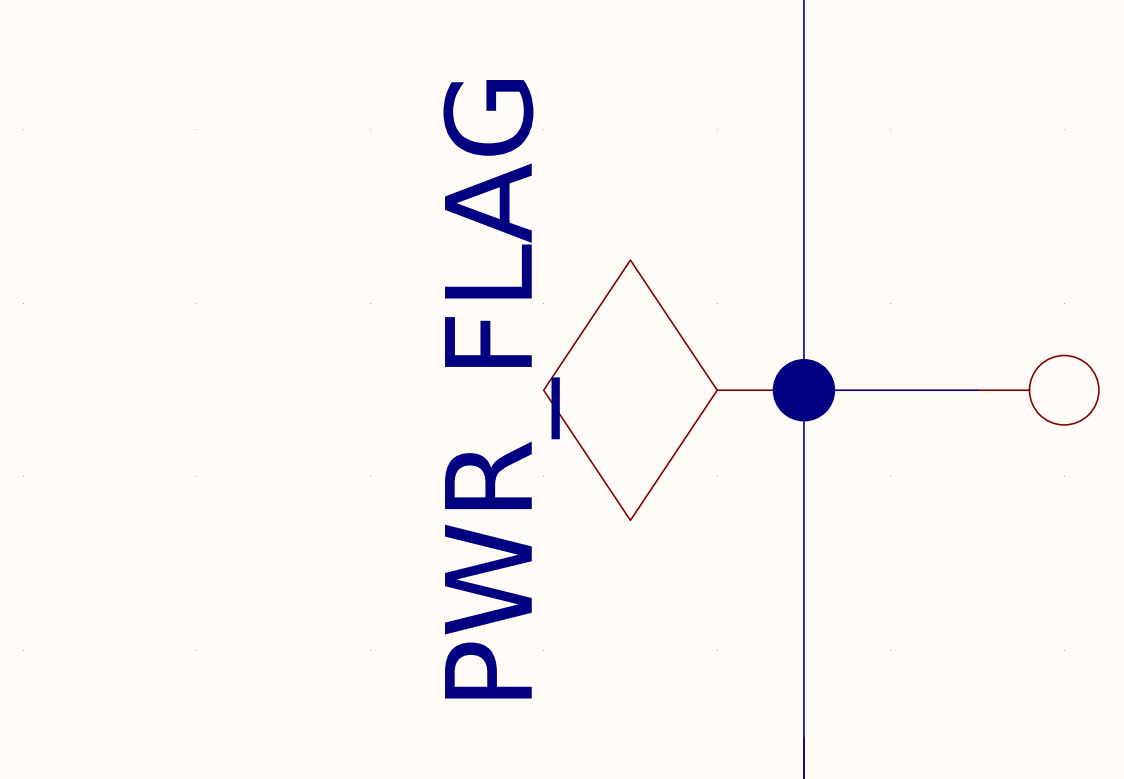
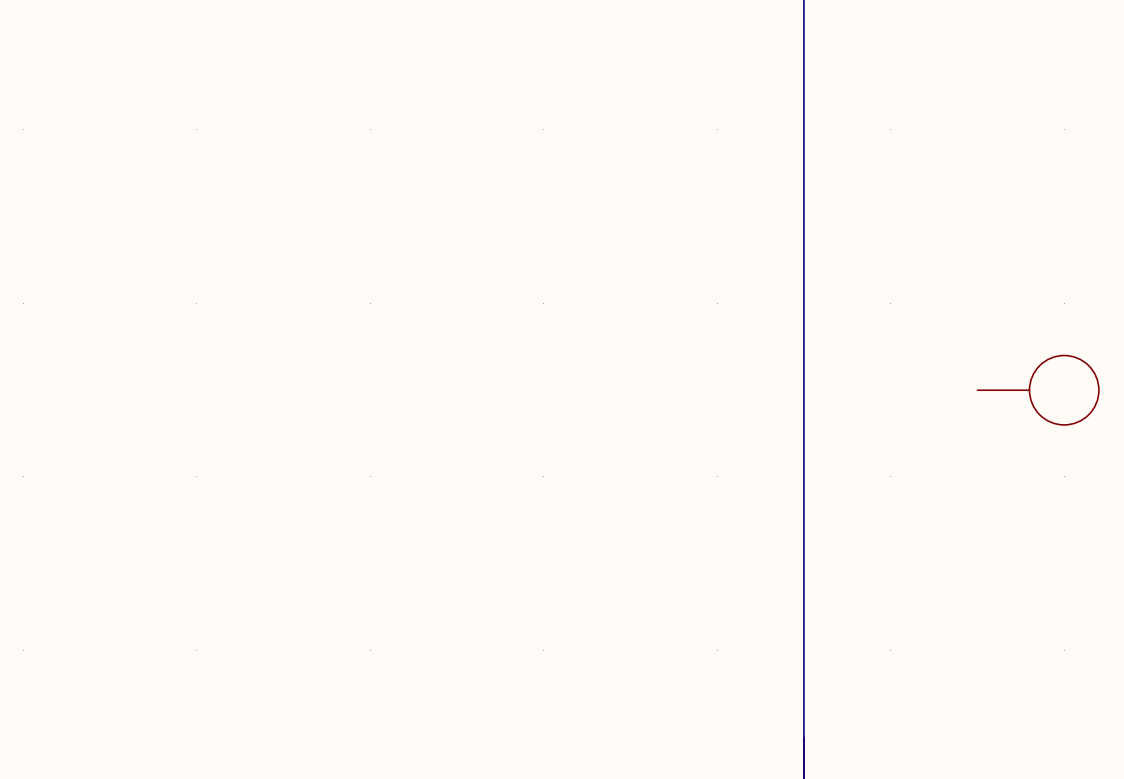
power symbol: PWR_FLAG (673, 390) -> none
wire: (803, 390) (977, 390) -> none
junction: (803, 390) -> none

